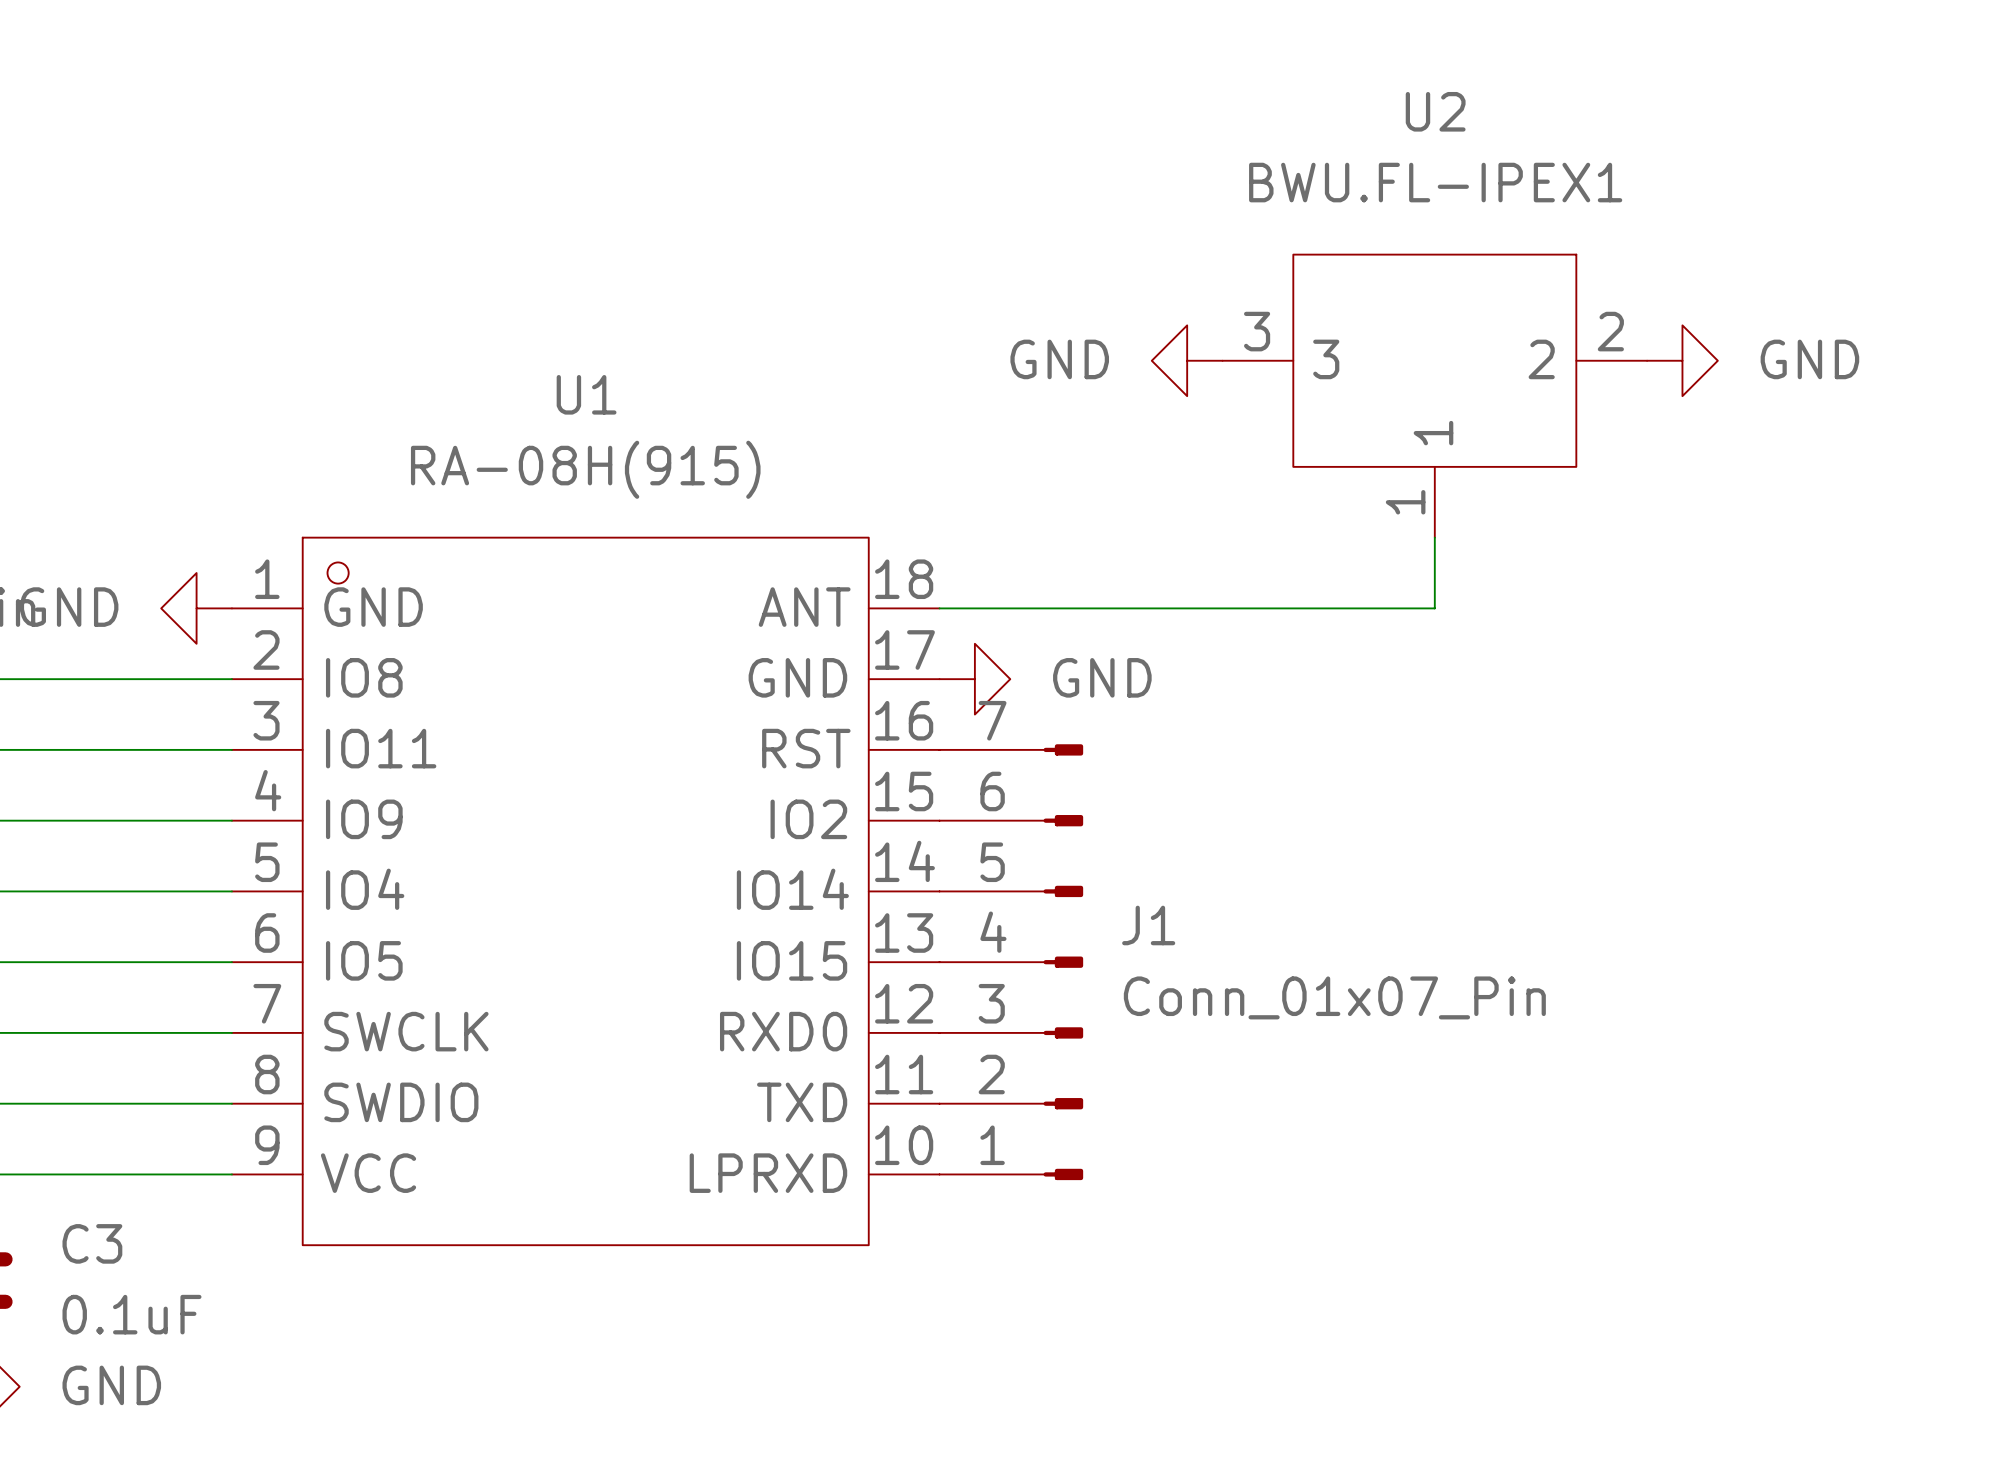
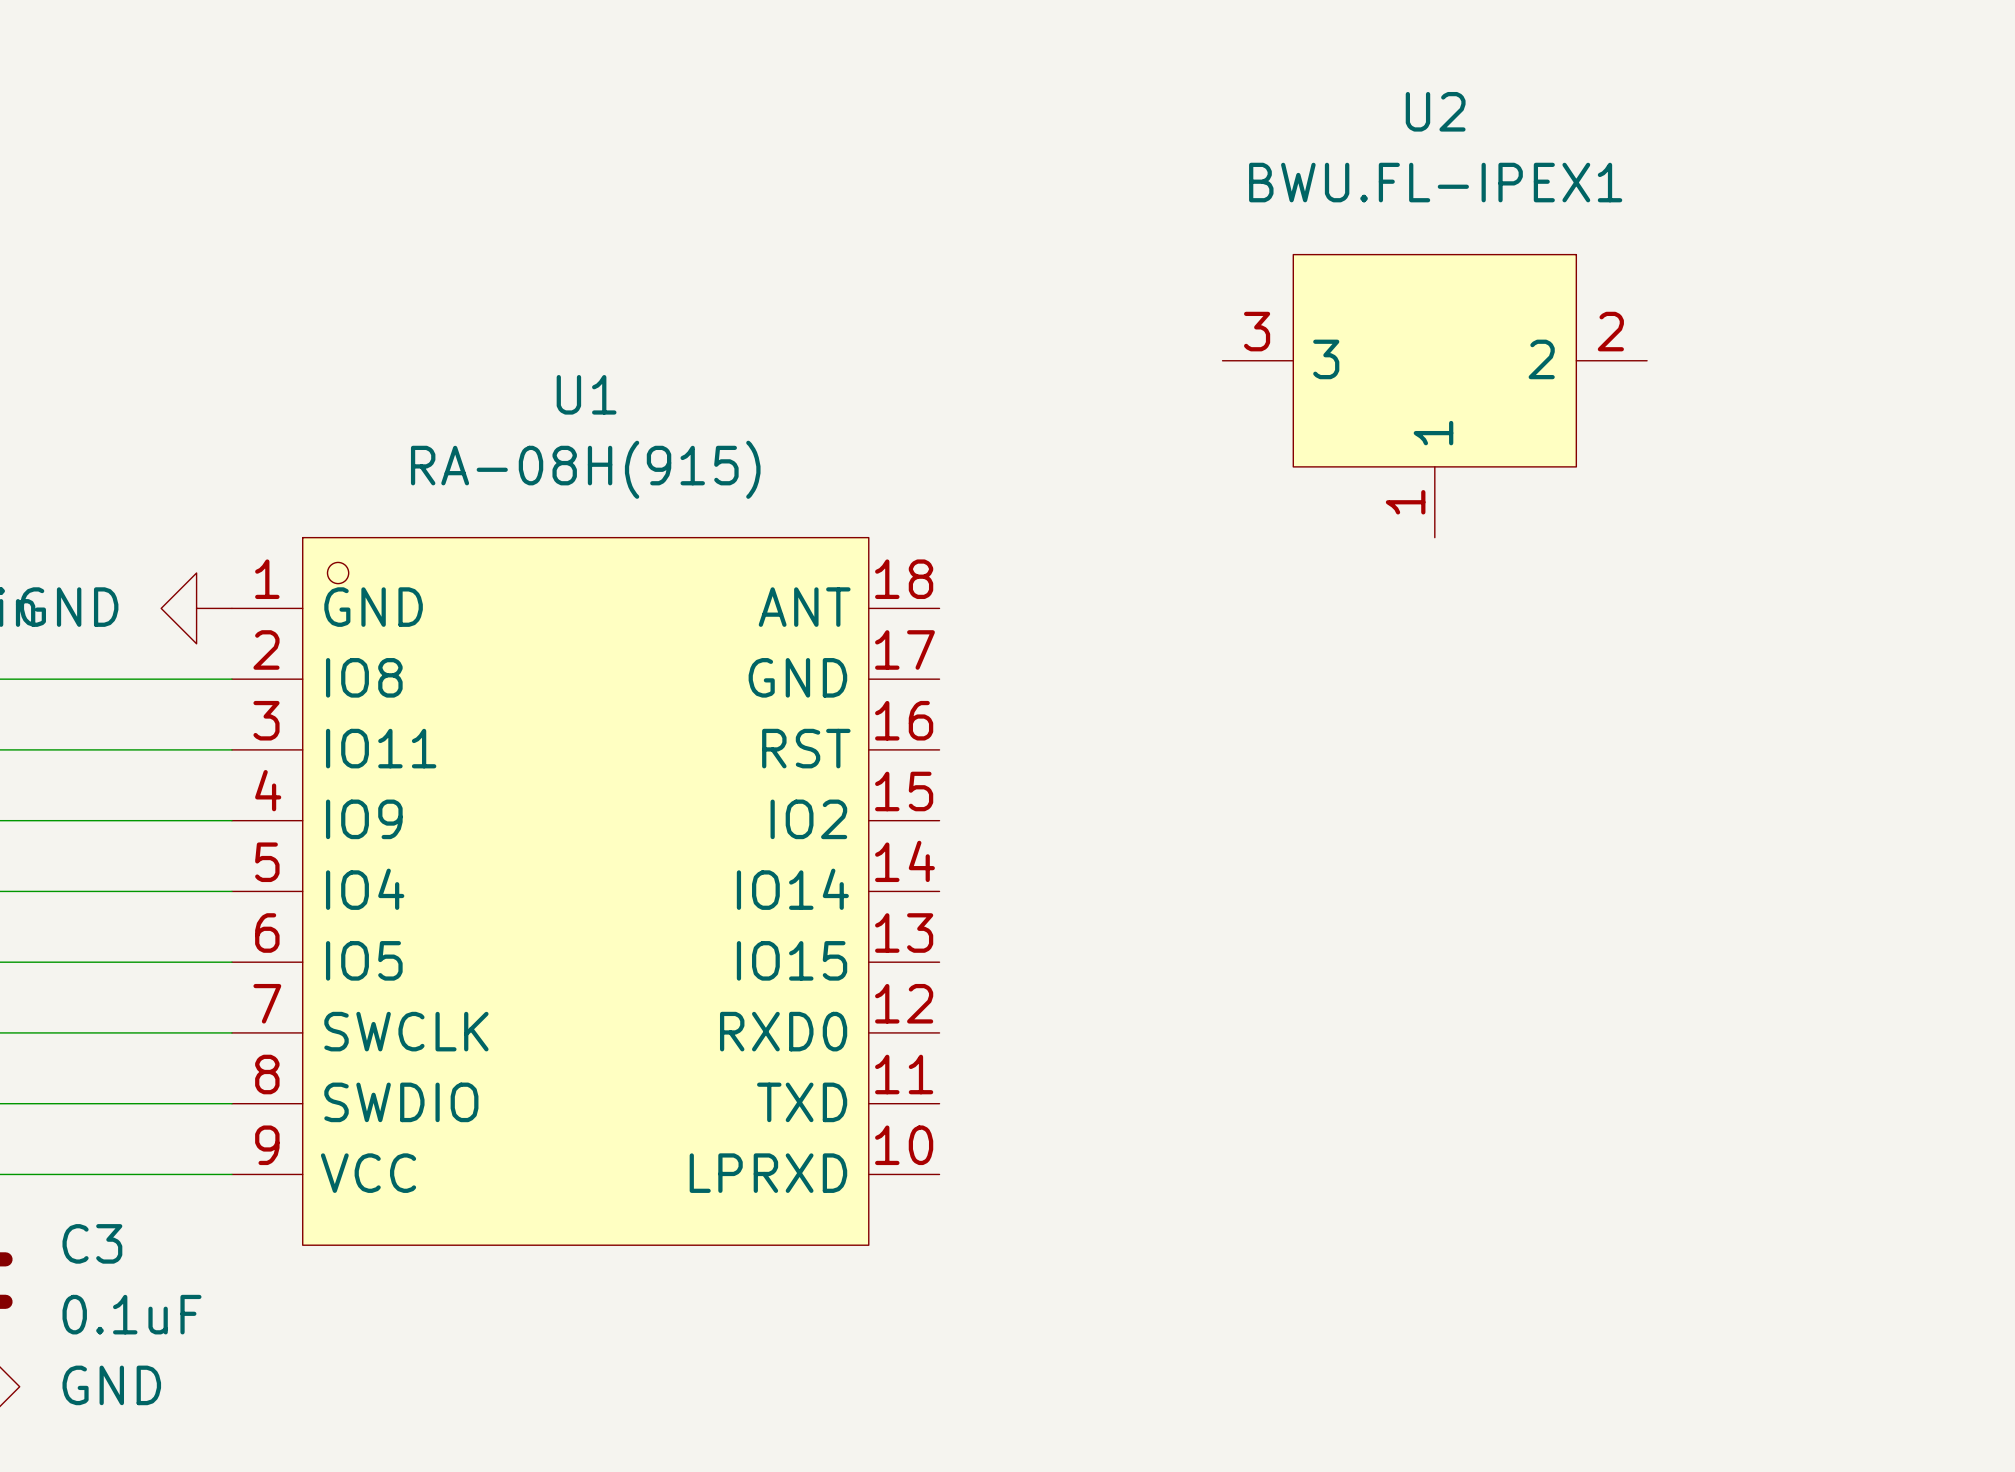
power symbol: GND (1187, 360) -> none
power symbol: GND (1682, 360) -> none
wire: (1434, 537) (1434, 608) (939, 608) -> none
power symbol: GND (974, 679) -> none
J1: Conn_01x07_Pin (1011, 962) -> none

